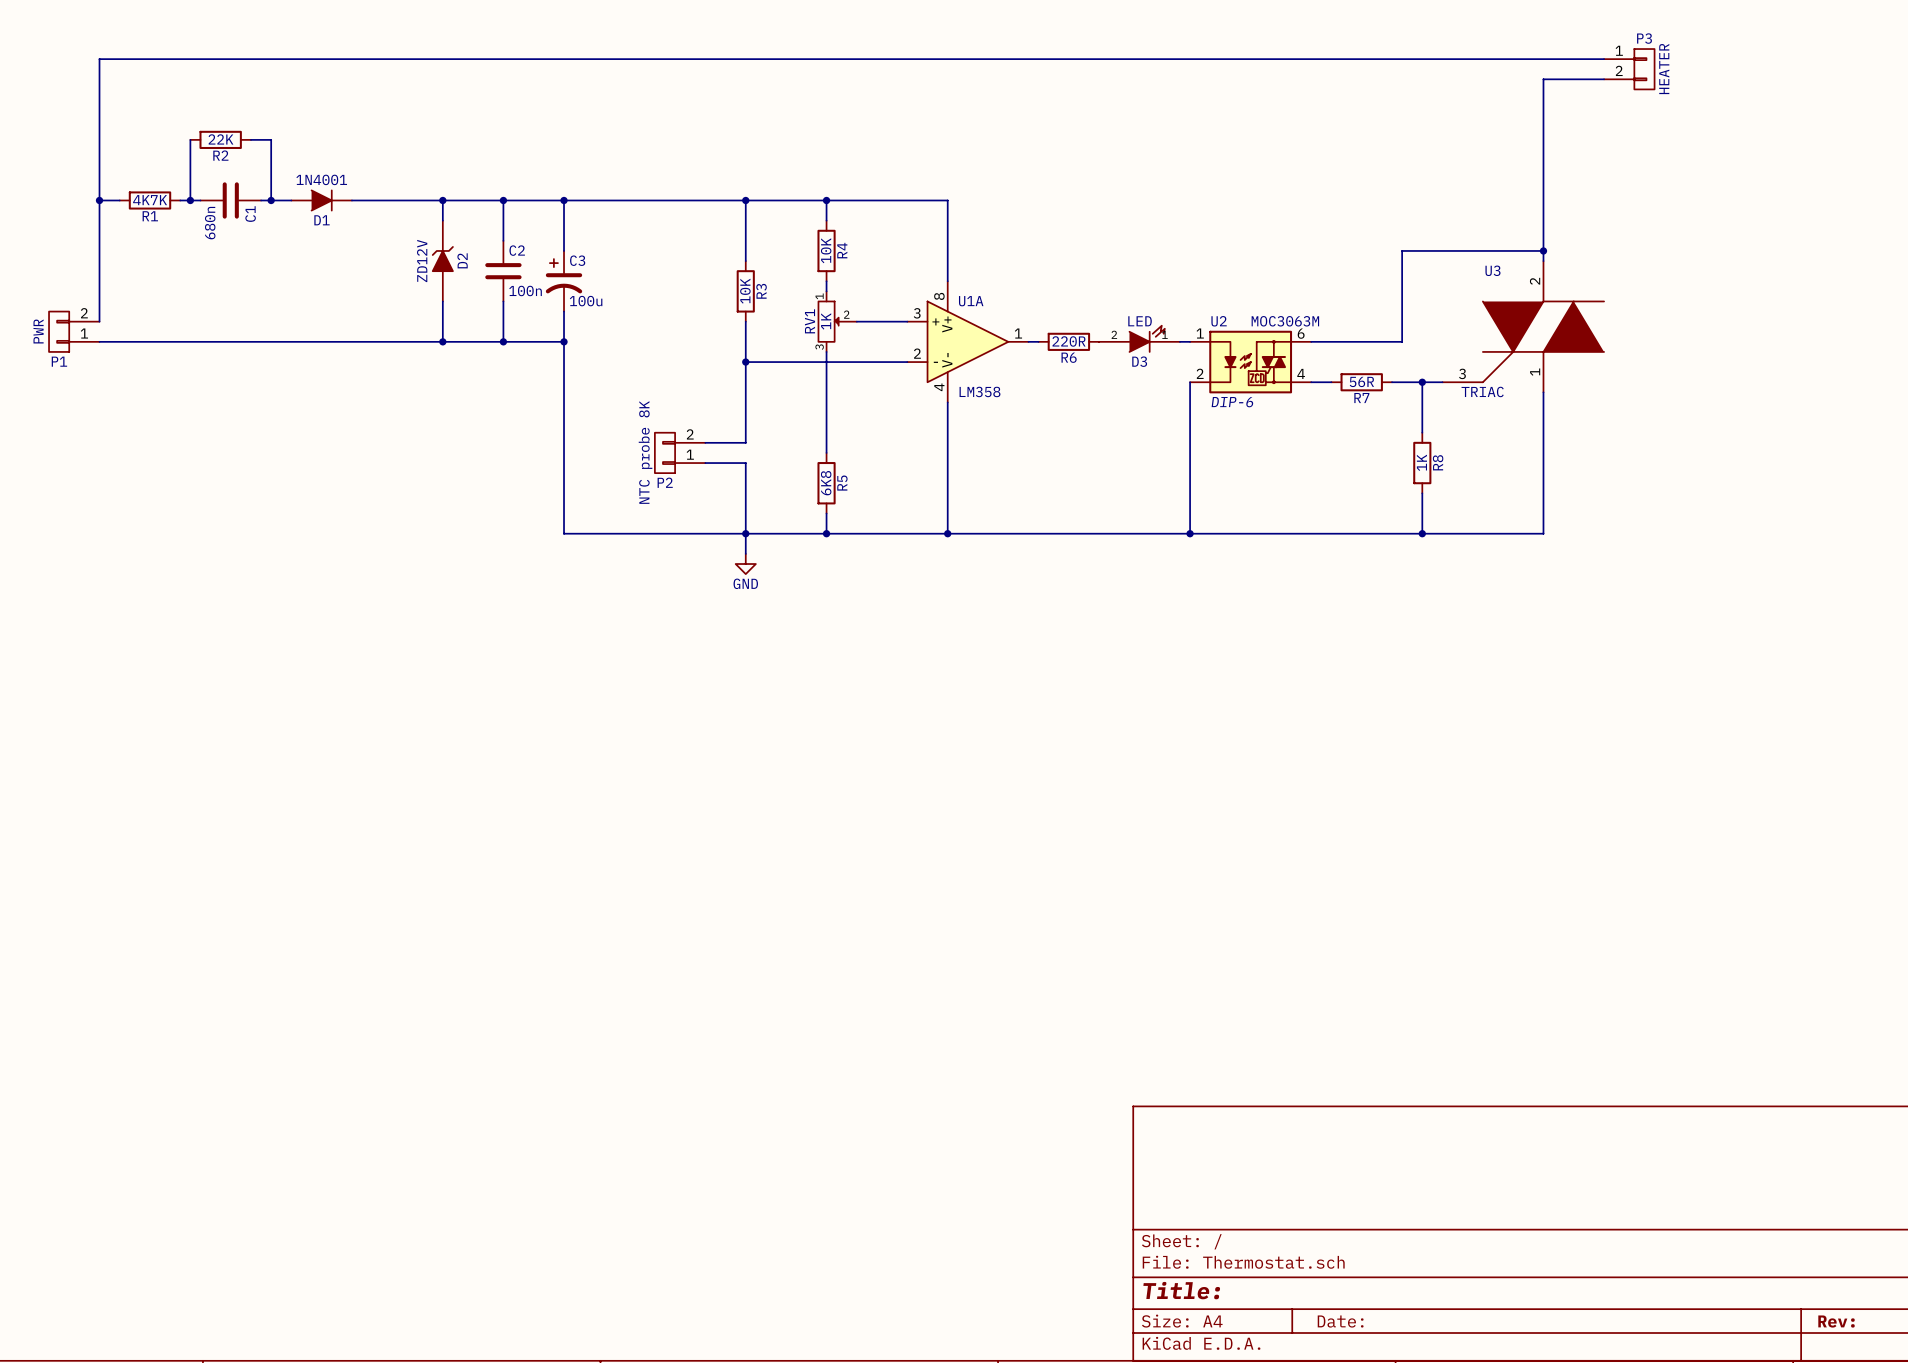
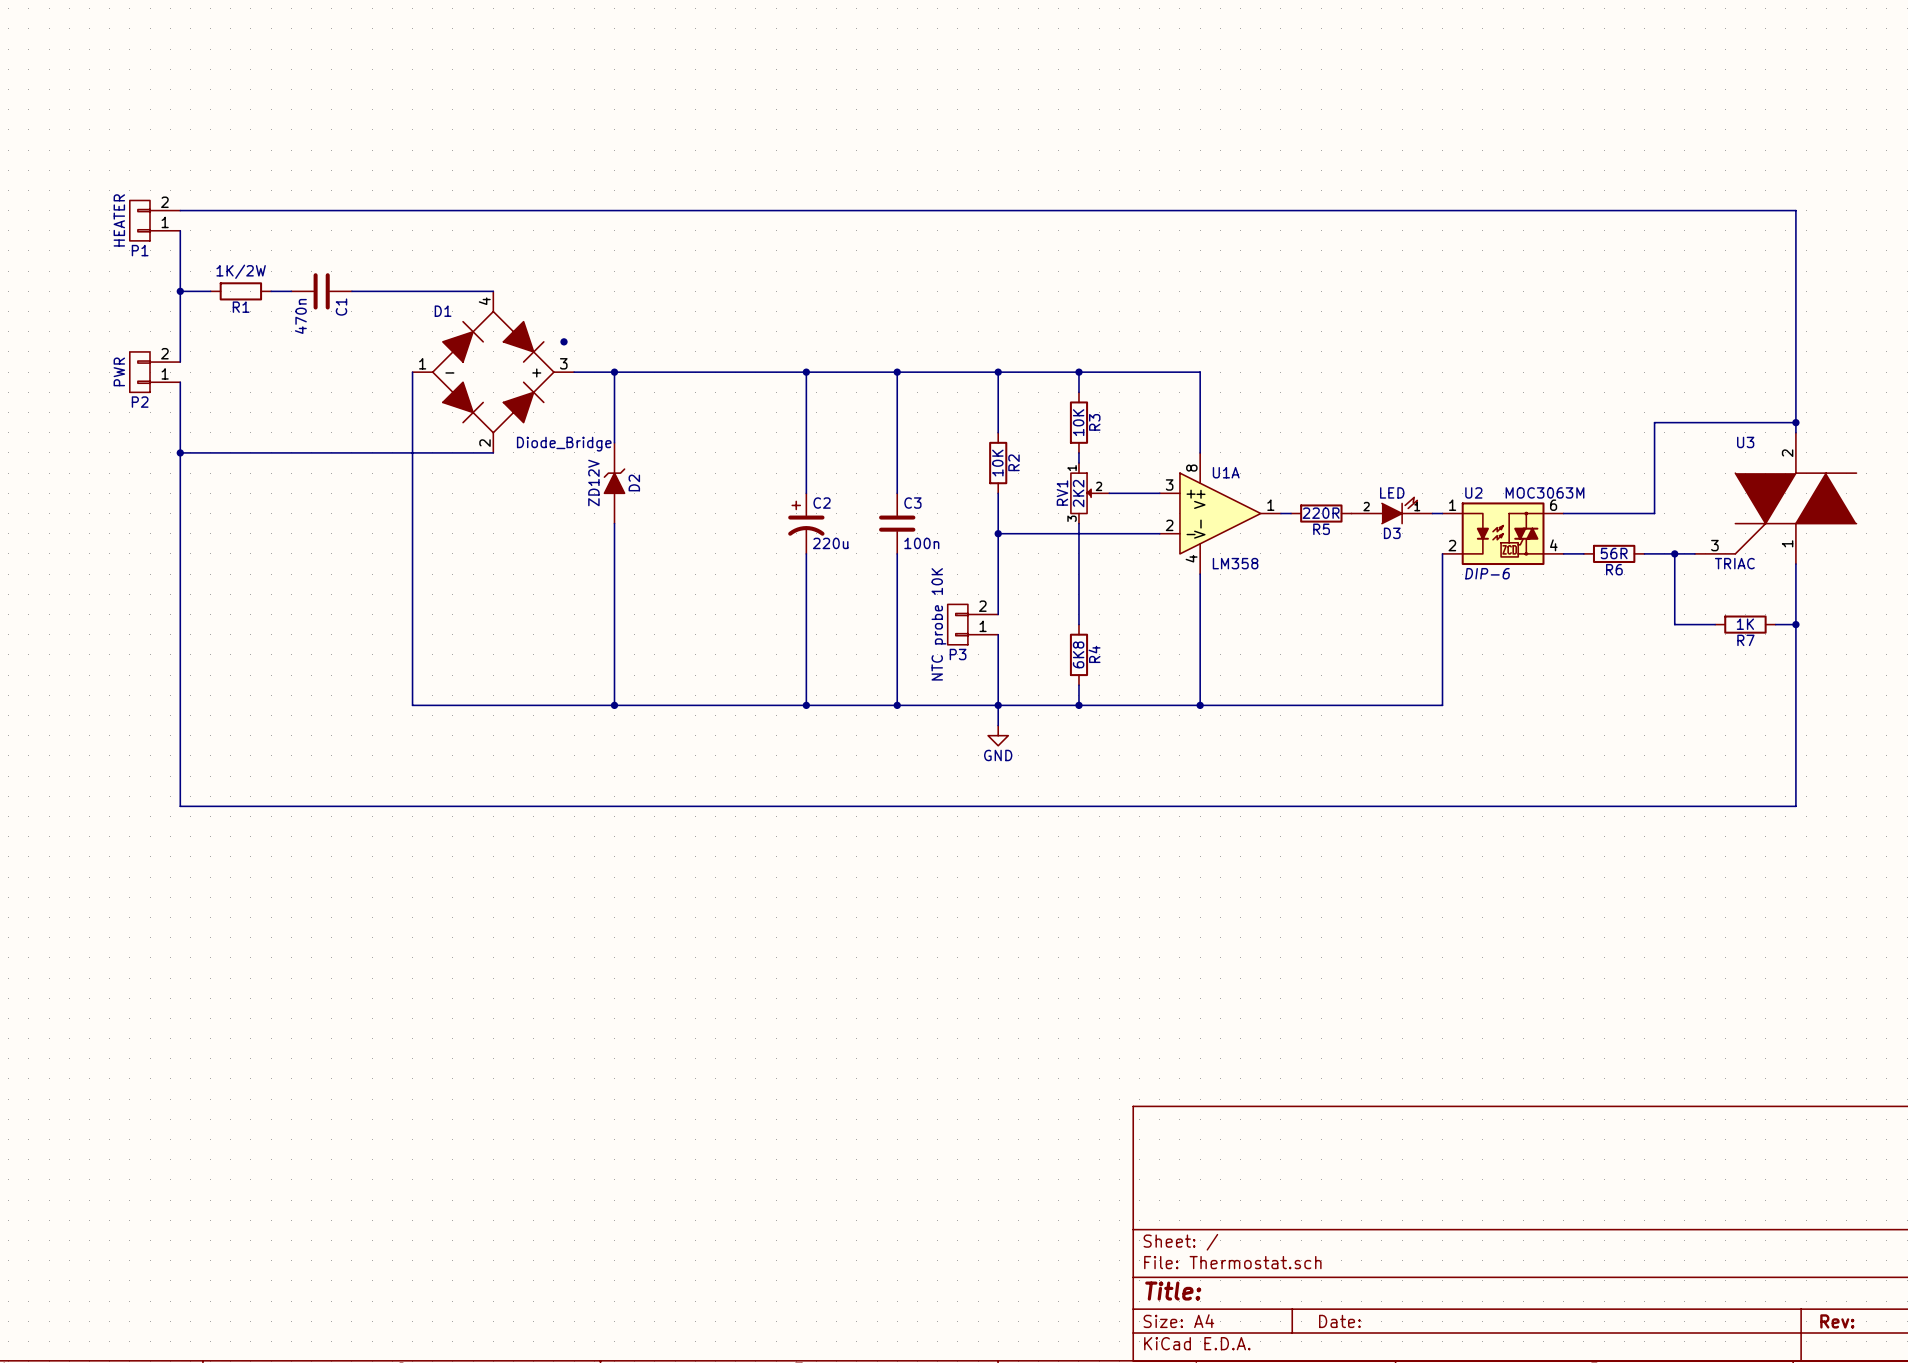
wire: (1604, 59) (99, 59) (99, 321) -> none
P3 position: (1629, 69) -> (972, 624)
P3 rotation: 0° (1644, 69) -> 180° (957, 624)
P3 value: HEATER (1664, 69) -> NTC probe 10K (938, 624)
wire: (1604, 79) (1543, 79) (1543, 261) -> none
wire: (190, 139) (190, 200) -> none
R2 rotation: 0° (220, 139) -> 90° clockwise (998, 463)
R2 position: (220, 139) -> (998, 463)
R2 value: 22K (220, 139) -> 10K (997, 463)
wire: (250, 139) (271, 139) (271, 200) -> none
R2 name position: R2 (220, 155) -> R2 (1013, 462)
D1 value: 1N4001 (321, 179) -> Diode_Bridge (564, 444)
D1 symbol: [291, 189, 352, 212] -> [412, 291, 575, 453]
wire: (99, 200) (119, 200) -> none
junction: (99, 200) -> none
R1 position: (150, 200) -> (240, 291)
R1 value: 4K7K (150, 200) -> 1K/2W (241, 271)
wire: (180, 200) (200, 200) -> (271, 291) (291, 291)
junction: (190, 200) -> none
C1 position: (230, 200) -> (321, 291)
wire: (261, 200) (291, 200) -> (180, 291) (210, 291)
junction: (271, 200) -> none
wire: (351, 200) (947, 200) (947, 281) -> none
wire: (442, 200) (442, 220) -> none
junction: (442, 200) -> none
wire: (503, 200) (503, 240) -> none
junction: (503, 200) -> none
wire: (564, 200) (564, 250) -> none
junction: (564, 200) -> none
wire: (745, 200) (745, 261) -> none
junction: (745, 200) -> none
wire: (826, 200) (826, 220) -> none
junction: (826, 200) -> none
wire: none -> (180, 210) (1795, 210) (1795, 432)
D1 name position: D1 (322, 220) -> D1 (443, 311)
C1 value: 680n (210, 223) -> 470n (300, 316)
wire: none -> (180, 230) (180, 362)
C2 symbol: [485, 240, 522, 302] -> [788, 493, 825, 554]
C3 symbol: [545, 250, 583, 312] -> [879, 493, 916, 554]
R4 position: (826, 250) -> (1078, 654)
R4 value: 10K (826, 250) -> 6K8 (1078, 654)
wire: (1543, 250) (1402, 250) (1402, 341) (1311, 341) -> none
junction: (1543, 250) -> none
D2 position: (442, 261) -> (614, 483)
wire: (826, 281) (826, 291) -> none
C2 value: 100n (525, 290) -> 220u (830, 543)
junction: none -> (180, 291)
wire: none -> (351, 291) (493, 291)
R3 position: (745, 291) -> (1078, 422)
wire: (442, 301) (442, 341) -> none
wire: (503, 301) (503, 341) -> none
C3 value: 100u (586, 301) -> 100n (921, 543)
wire: (564, 311) (564, 533) (998, 533) -> none
wire: (745, 321) (745, 442) (705, 442) -> none
RV1 value: 1K (826, 321) -> 2K2 (1078, 493)
RV1 position: (837, 321) -> (1090, 493)
wire: (856, 321) (907, 321) -> none
U3 position: (1523, 326) -> (1775, 498)
P1 value: PWR (38, 331) -> HEATER (119, 220)
P1 position: (74, 331) -> (155, 220)
D3 position: (1139, 338) -> (1392, 510)
wire: (99, 341) (564, 341) -> none
junction: (442, 341) -> none
junction: (503, 341) -> none
U1A position: (967, 341) -> (1220, 513)
wire: (1028, 341) (1038, 341) -> none
R6 position: (1068, 341) -> (1614, 553)
R6 value: 220R (1068, 341) -> 56R (1614, 553)
wire: (1179, 341) (1190, 341) -> none
wire: (826, 351) (826, 452) -> none
wire: (745, 362) (907, 362) -> none
junction: (745, 362) -> none
U2 position: (1250, 362) -> (1503, 533)
wire: none -> (412, 372) (412, 705) (1442, 705) (1442, 553)
wire: none -> (574, 372) (1200, 372) (1200, 452)
wire: none -> (614, 372) (614, 442)
junction: none -> (614, 372)
wire: none -> (806, 372) (806, 493)
junction: none -> (806, 372)
wire: none -> (897, 372) (897, 493)
junction: none -> (897, 372)
wire: none -> (998, 372) (998, 432)
junction: none -> (998, 372)
wire: none -> (1078, 372) (1078, 392)
junction: none -> (1078, 372)
R7 value: 56R (1361, 381) -> 1K (1745, 624)
wire: none -> (180, 382) (180, 806) (1795, 806) (1795, 564)
wire: (1190, 382) (1190, 533) -> none
wire: (1311, 382) (1331, 382) -> none
R7 position: (1361, 382) -> (1745, 624)
wire: (1392, 382) (1442, 382) -> none
wire: (1422, 382) (1422, 432) -> none
junction: (1422, 382) -> none
wire: (1543, 392) (1543, 533) (1159, 533) -> none
wire: (947, 402) (947, 533) -> none
wire: none -> (1795, 422) (1654, 422) (1654, 513) (1563, 513)
junction: none -> (1795, 422)
wire: none -> (180, 452) (493, 452)
junction: none -> (180, 452)
P2 value: NTC probe 8K (645, 452) -> PWR (119, 371)
P2 position: (680, 452) -> (155, 372)
wire: none -> (1078, 452) (1078, 463)
wire: (705, 463) (745, 463) (745, 553) -> none
R8: 1K (1422, 463) -> none
R5 rotation: 0° (826, 483) -> 90° clockwise (1321, 513)
R5 position: (826, 483) -> (1321, 513)
R5 value: 6K8 (826, 483) -> 220R (1321, 513)
wire: none -> (998, 493) (998, 614)
wire: none -> (1109, 493) (1159, 493)
wire: (1422, 493) (1422, 533) -> none
wire: (826, 513) (826, 533) -> none
wire: none -> (1280, 513) (1291, 513)
wire: none -> (1432, 513) (1442, 513)
wire: none -> (614, 523) (614, 705)
wire: none -> (1078, 523) (1078, 624)
junction: (745, 533) -> none
junction: (826, 533) -> none
junction: (947, 533) -> none
junction: none -> (998, 533)
junction: (1190, 533) -> none
junction: (1422, 533) -> none
wire: none -> (806, 553) (806, 705)
wire: none -> (897, 553) (897, 705)
wire: none -> (1563, 553) (1583, 553)
wire: none -> (1644, 553) (1694, 553)
wire: none -> (1674, 553) (1674, 624) (1715, 624)
junction: none -> (1674, 553)
power symbol: GND (745, 564) -> none
wire: none -> (1200, 574) (1200, 705)
wire: none -> (1775, 624) (1795, 624)
junction: none -> (1795, 624)
wire: none -> (998, 634) (998, 725)
wire: none -> (1078, 685) (1078, 705)
junction: none -> (614, 705)
junction: none -> (806, 705)
junction: none -> (897, 705)
junction: none -> (998, 705)
junction: none -> (1078, 705)
junction: none -> (1200, 705)
power symbol: none -> GND (998, 735)

